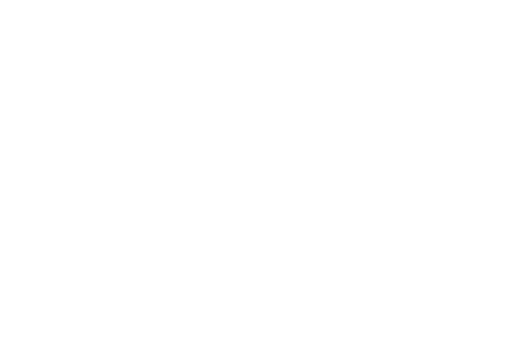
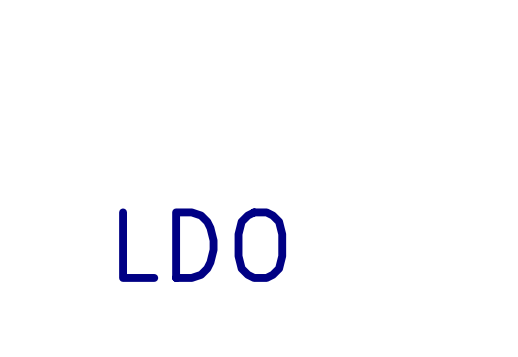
text: none -> LDO (202, 245)

